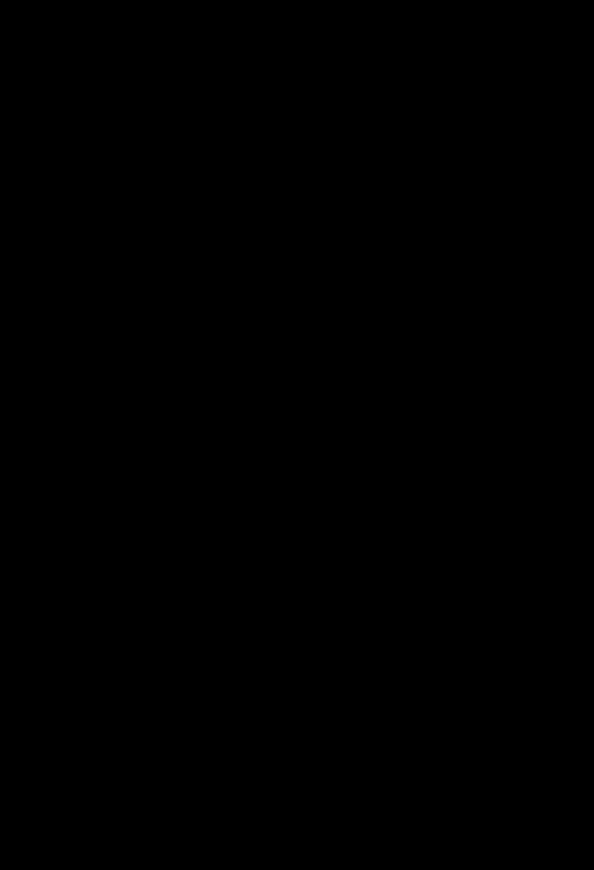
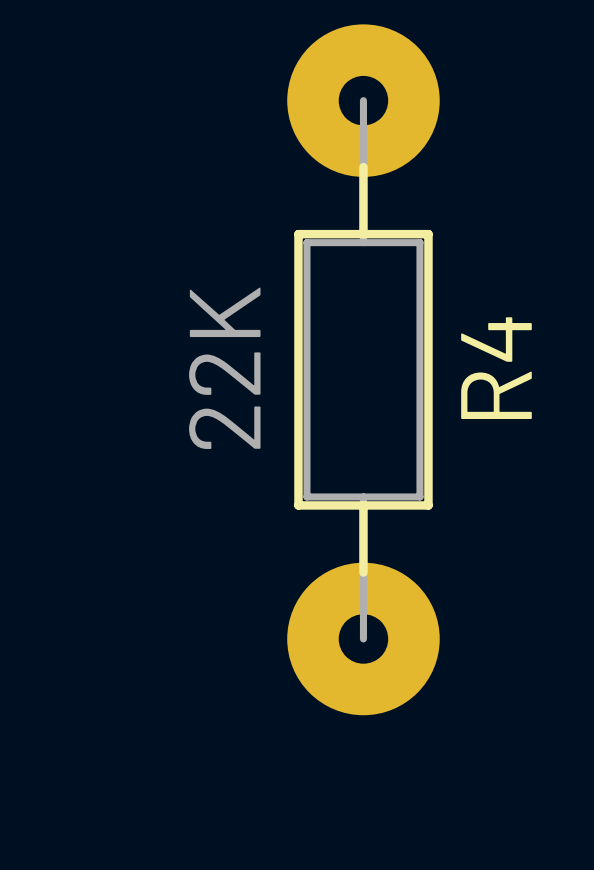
R4: none -> 22K (363, 369)

